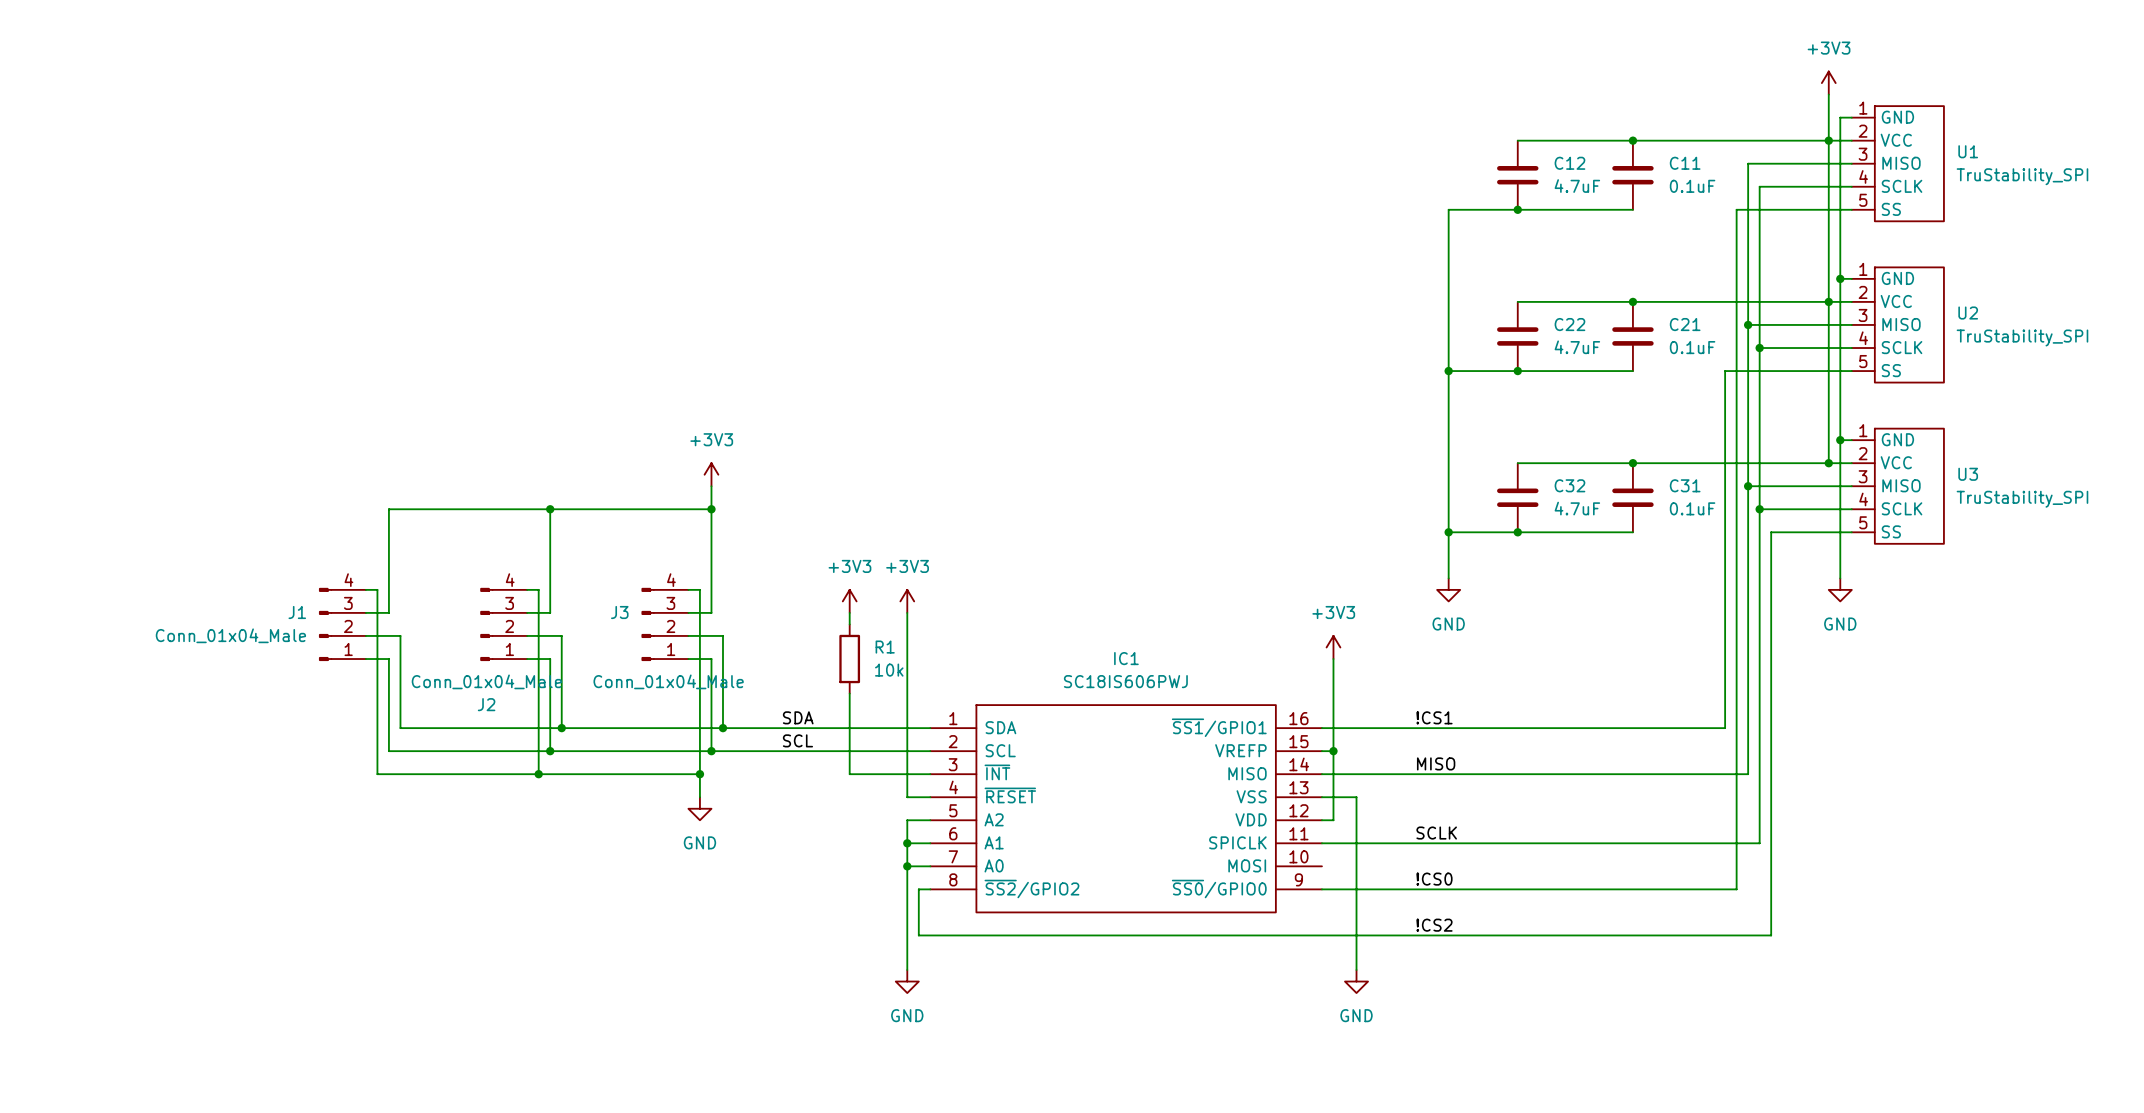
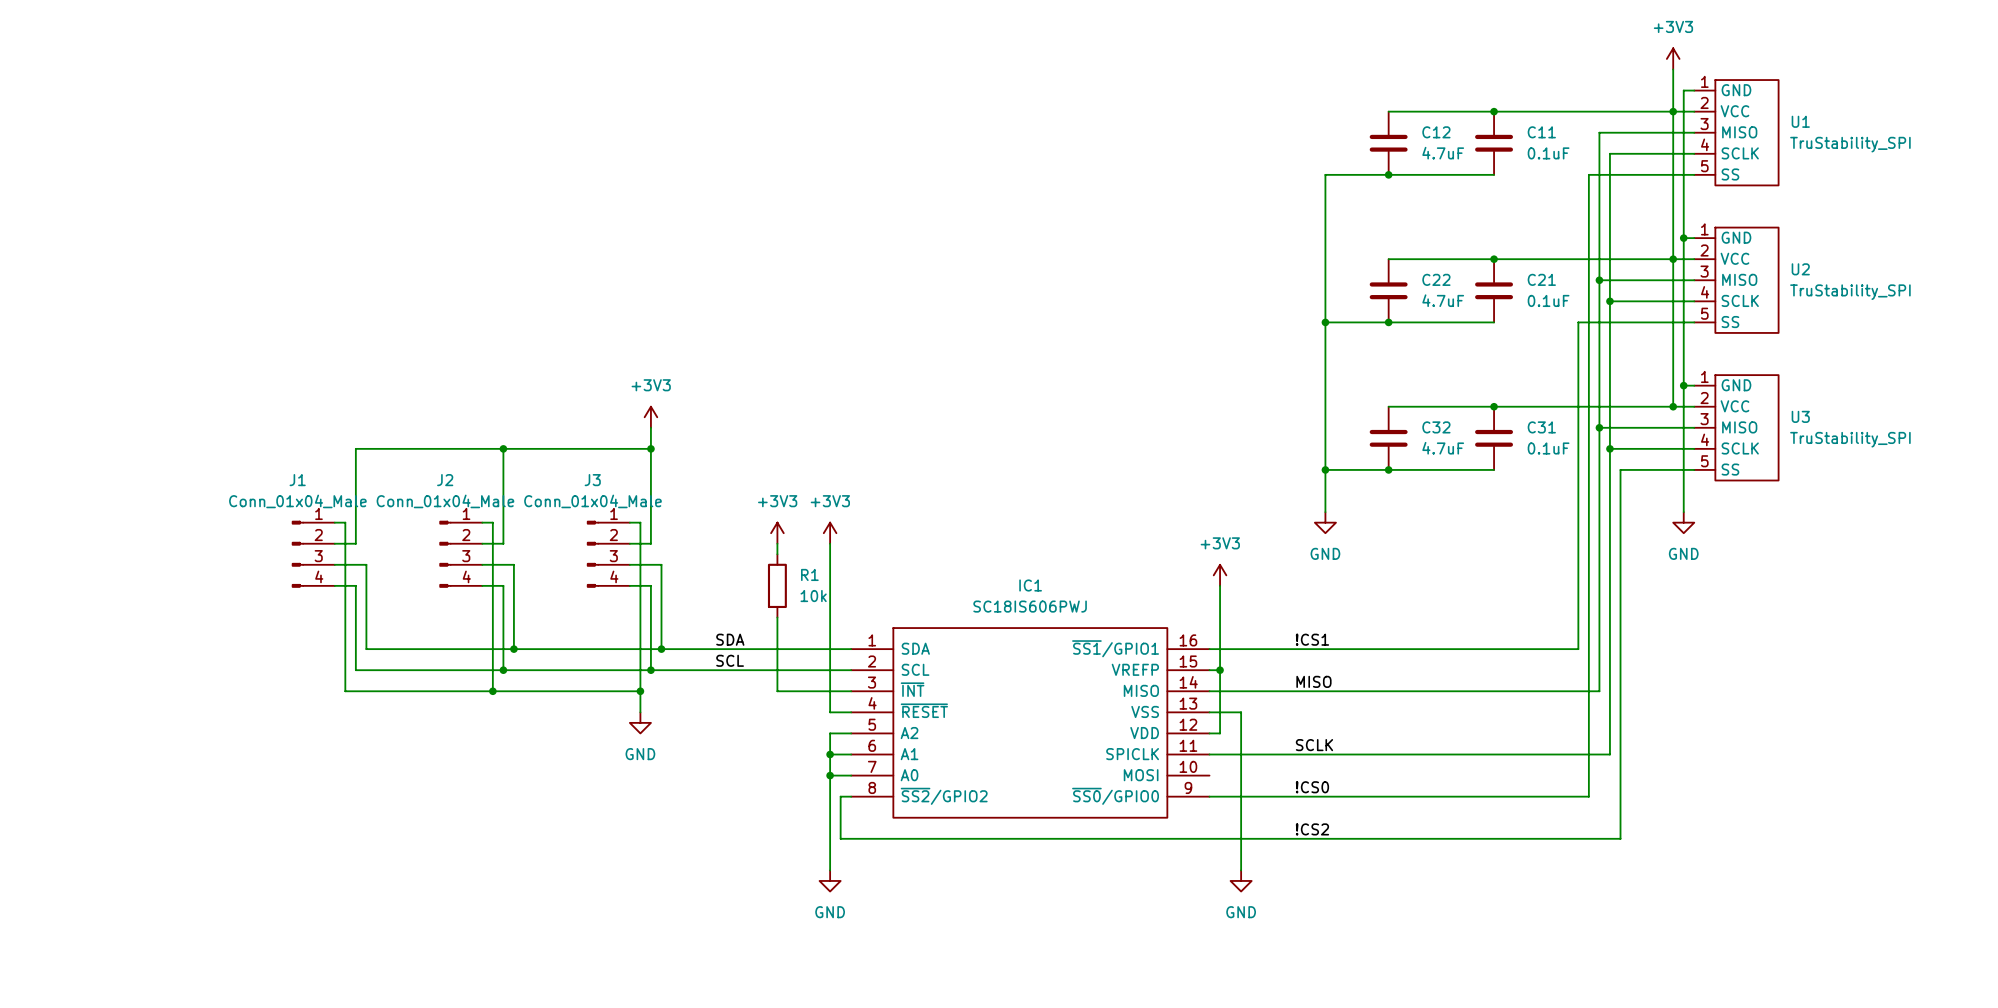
J1 name position: J1 (297, 612) -> J1 (297, 480)
J3 name position: J3 (619, 612) -> J3 (592, 480)
J1 flip: as is (325, 624) -> up-down (297, 554)
J2 flip: as is (486, 624) -> up-down (445, 554)
J3 flip: as is (648, 624) -> up-down (592, 554)
J1 value position: Conn_01x04_Male (230, 635) -> Conn_01x04_Male (297, 501)

